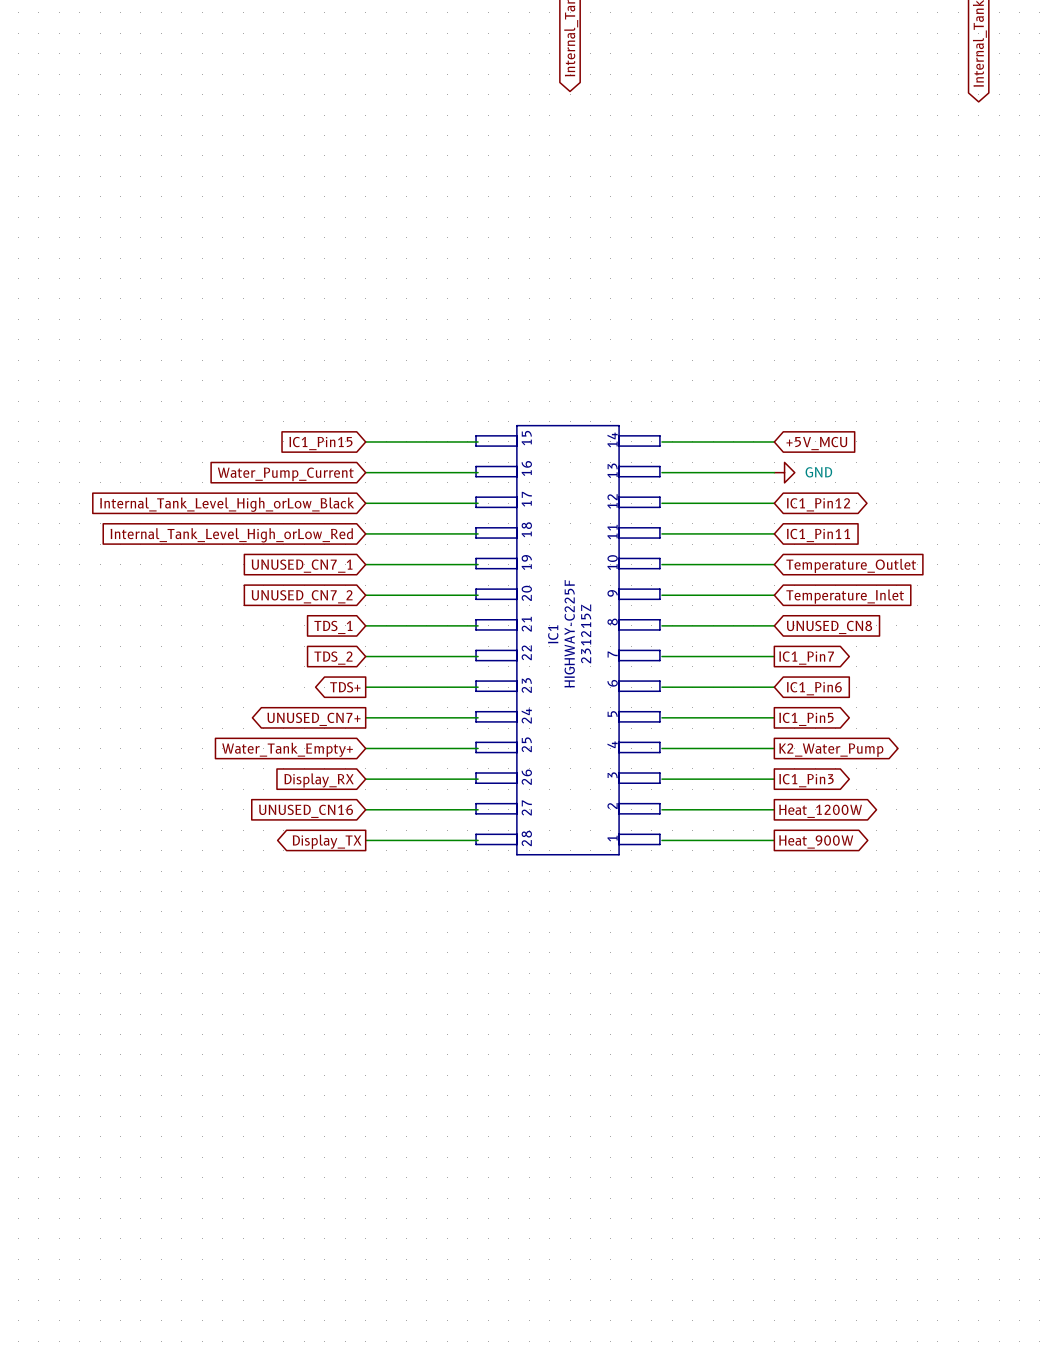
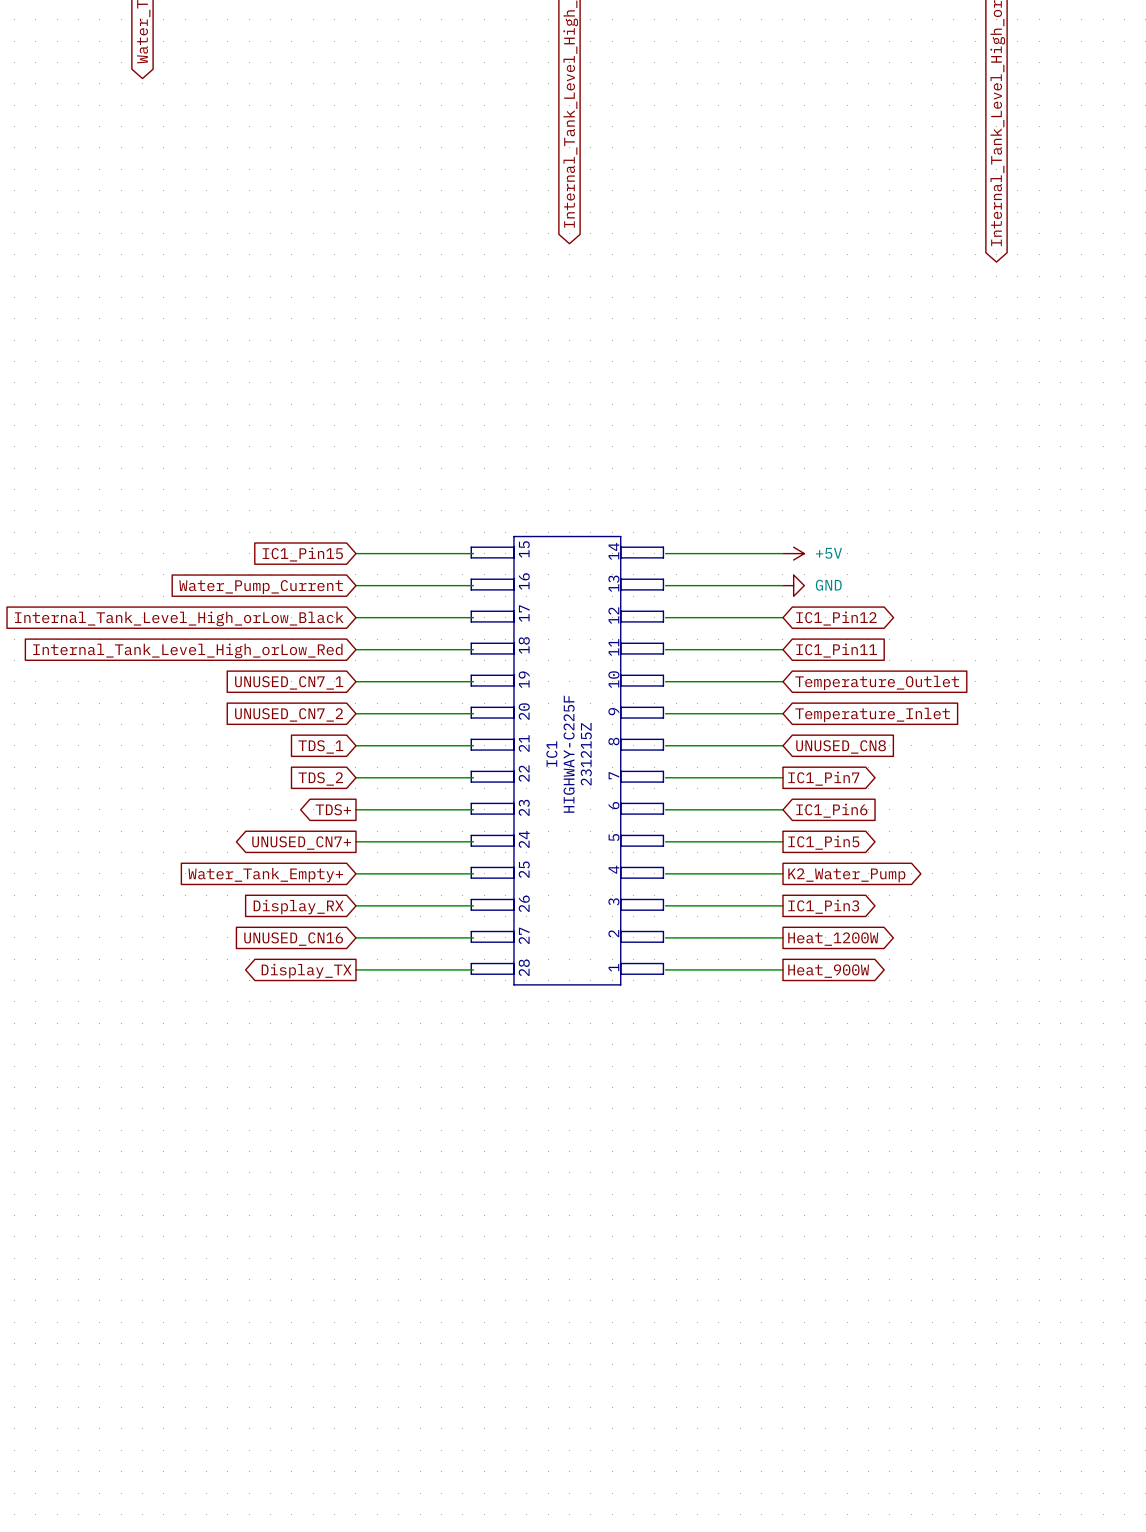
power symbol: none -> +5V (793, 553)
global label: +5V_MCU (816, 443) -> none

